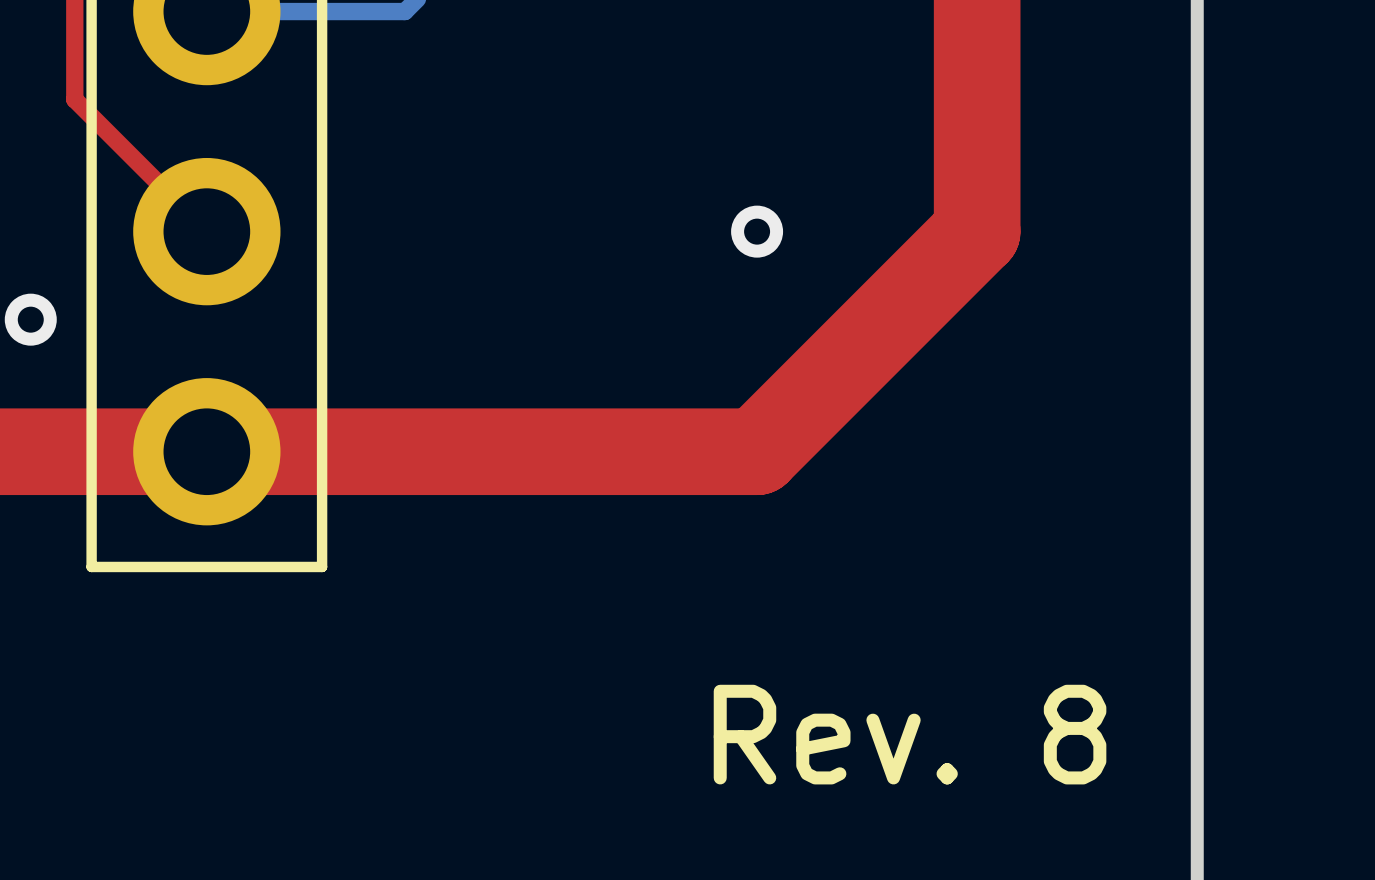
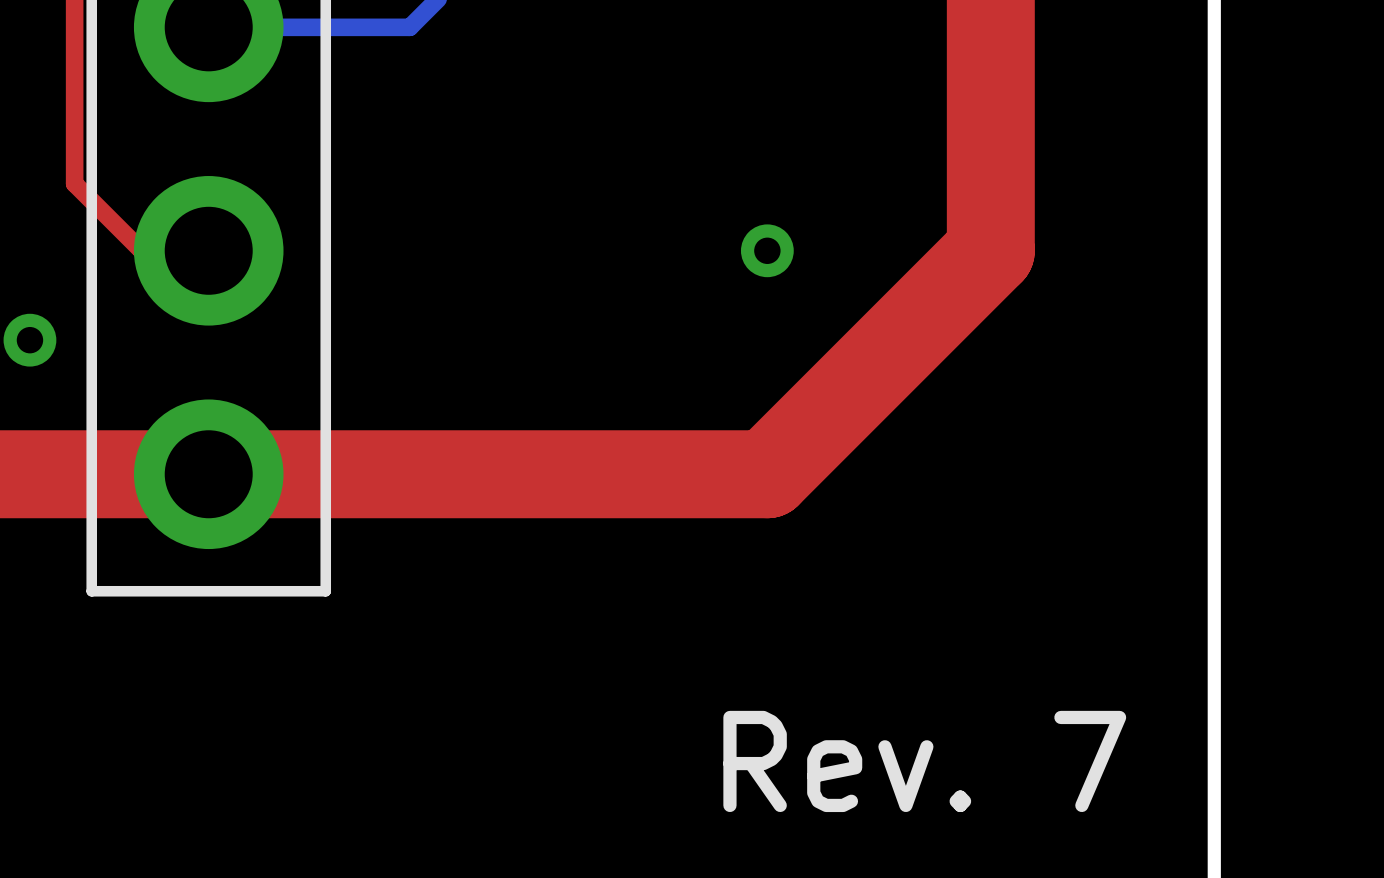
top track: (74, 99) (206, 231) -> (74, 116) (74, 183) (141, 250) (208, 250)
text: Rev. 8 (910, 734) -> Rev. 7 (924, 761)

